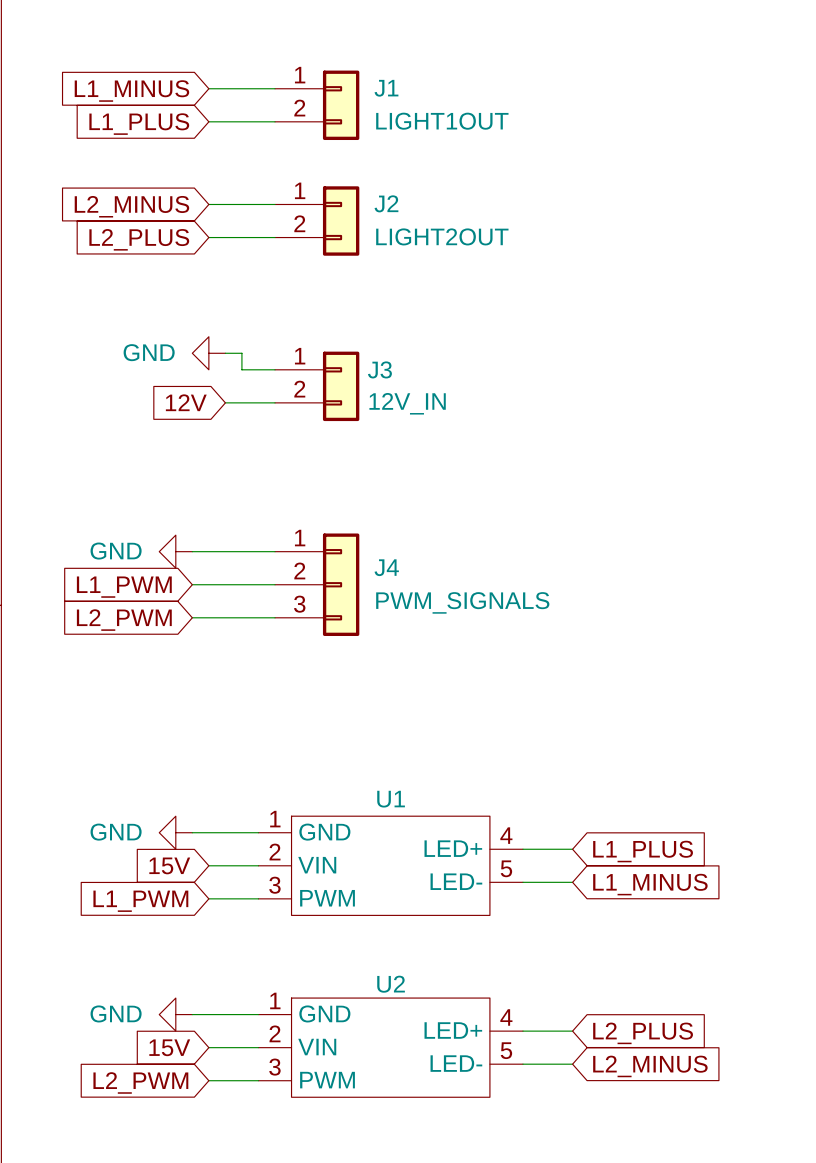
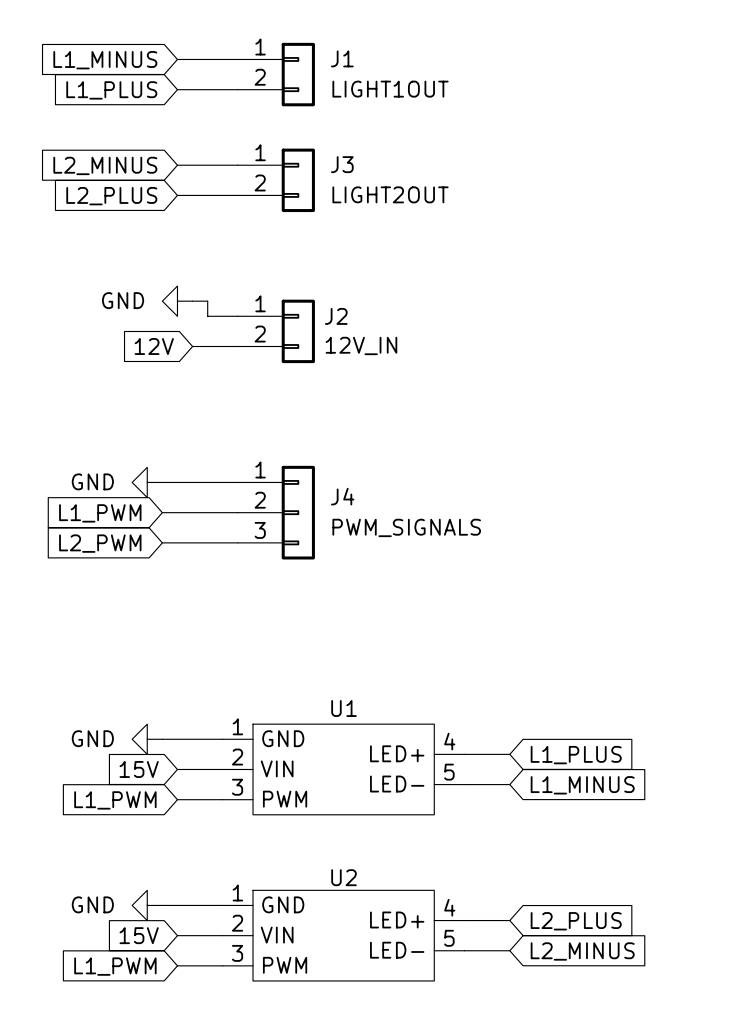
J2 name: J2 (386, 203) -> J3 (342, 164)
J3 name: J3 (379, 369) -> J2 (336, 316)
global label: L2_PWM (140, 1082) -> L1_PWM (115, 966)

